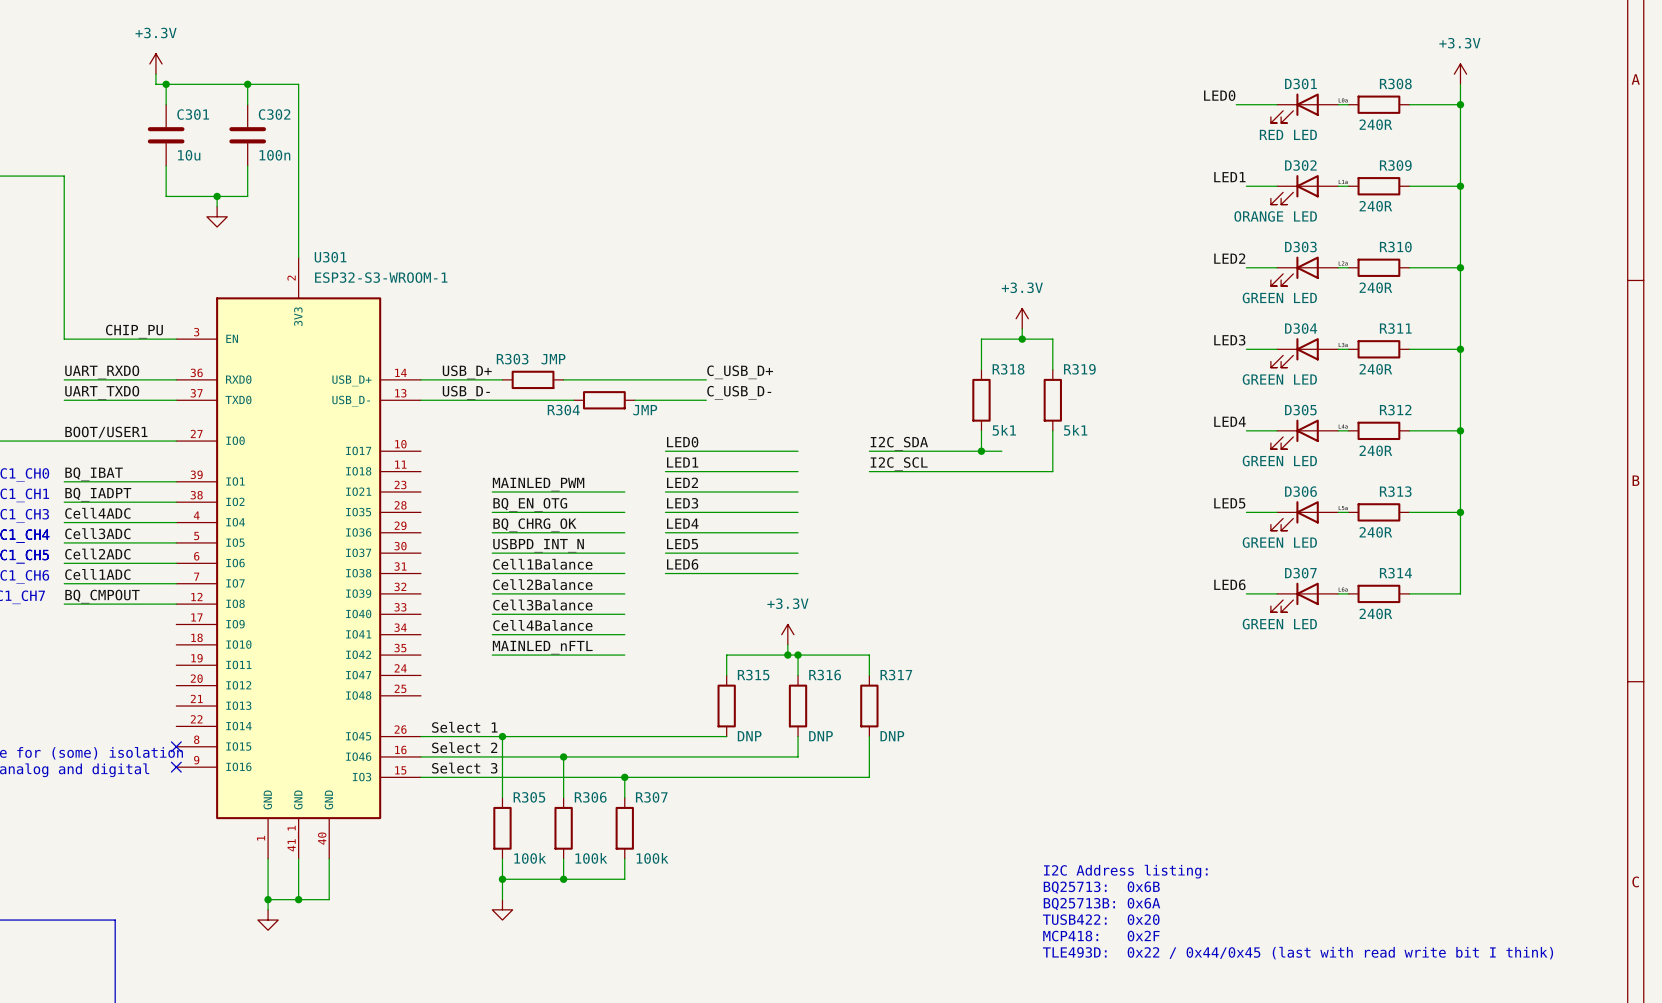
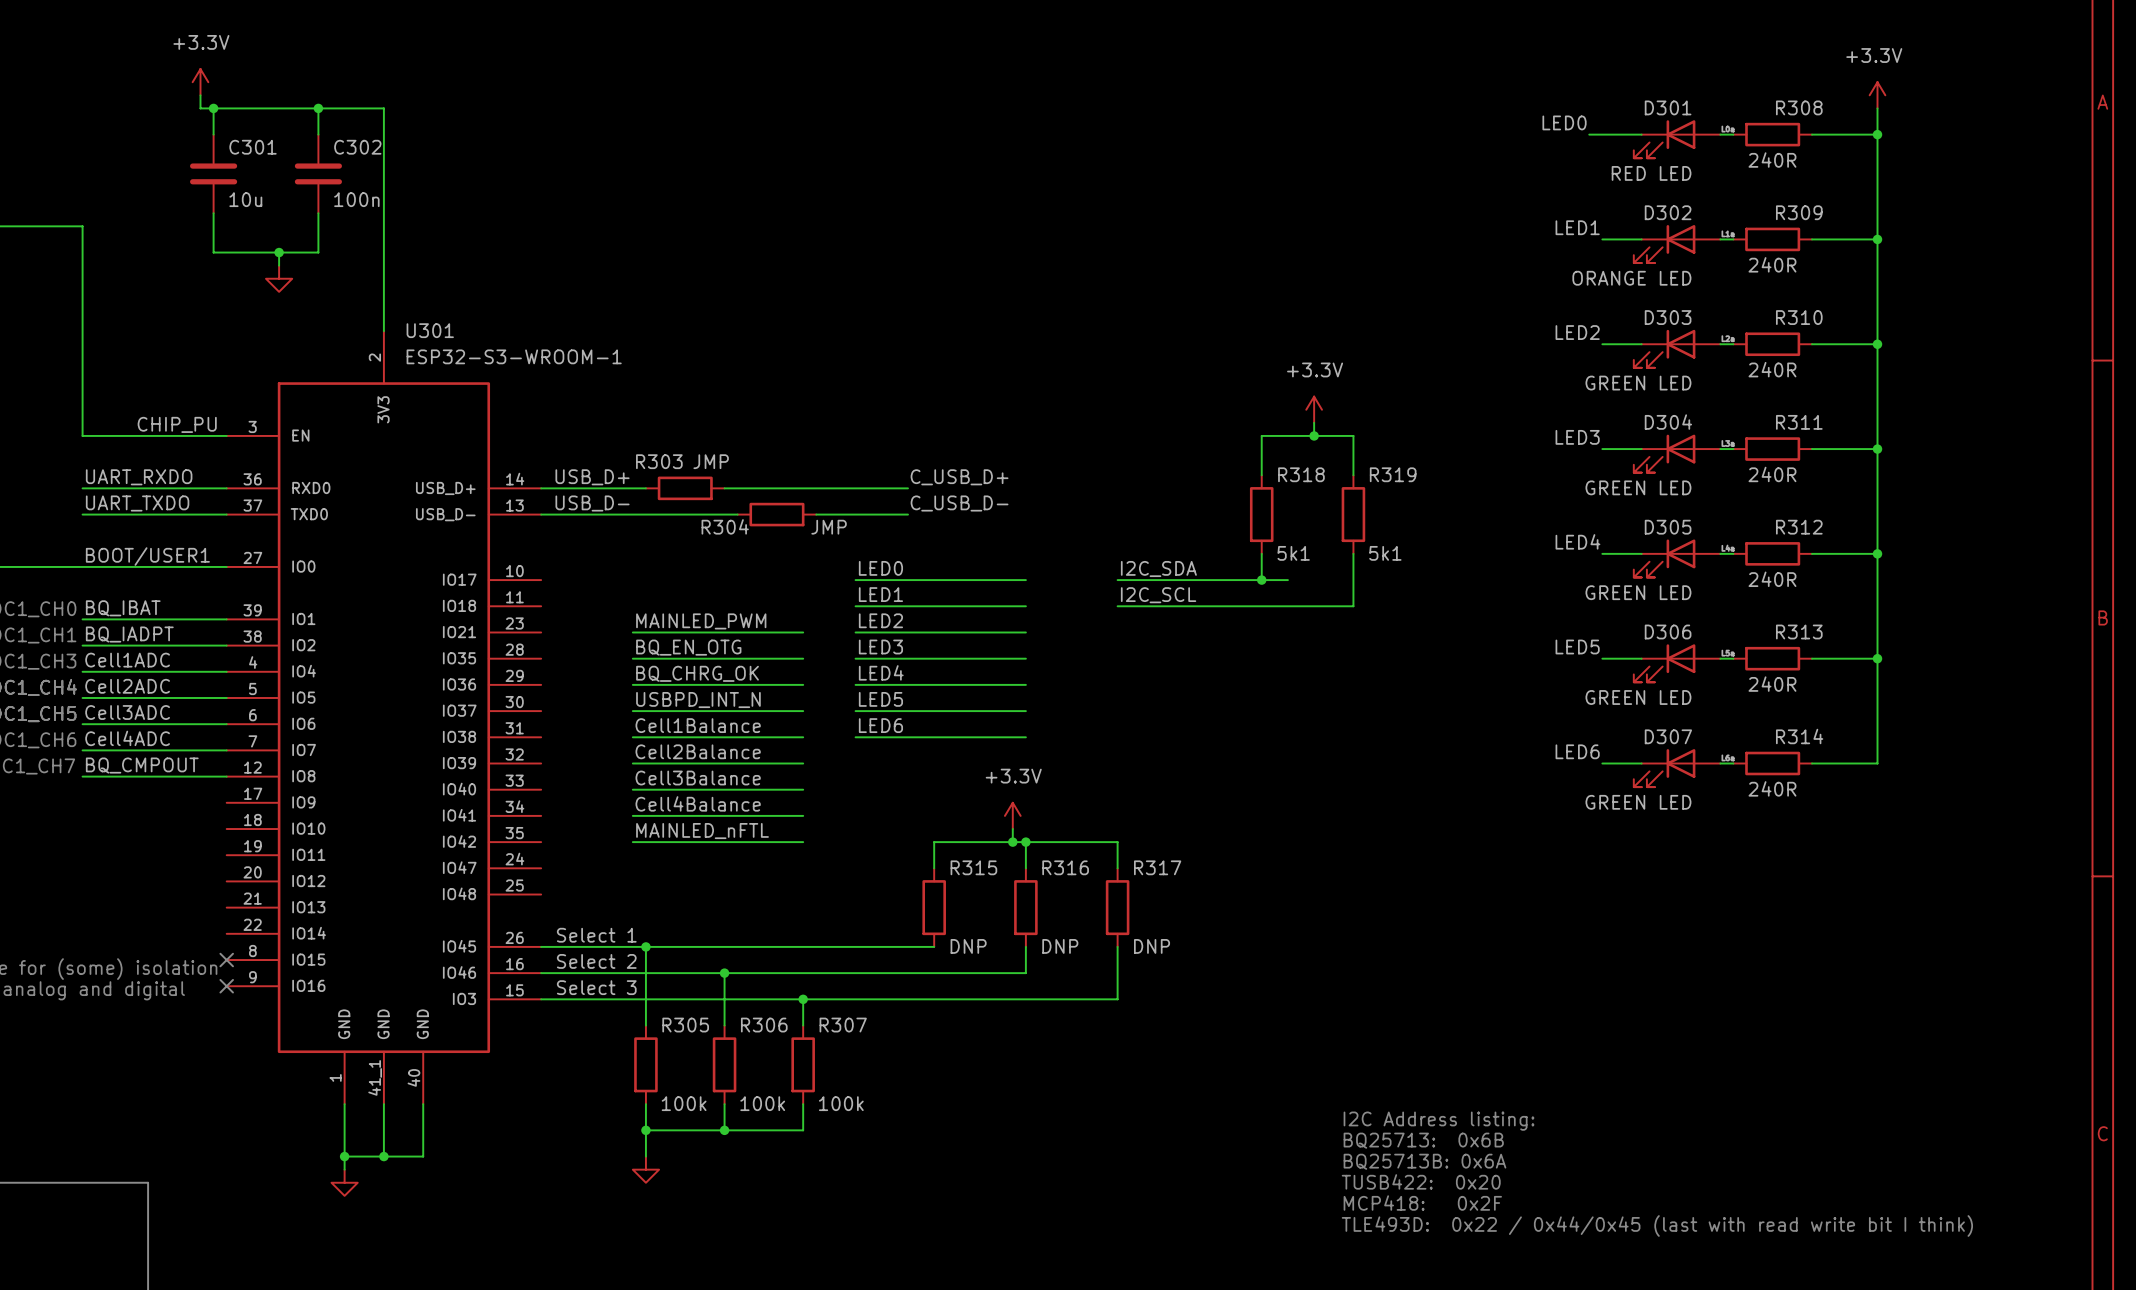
label: Cell4ADC (97, 513) -> Cell1ADC (127, 660)
label: Cell3ADC (97, 533) -> Cell2ADC (127, 686)
label: Cell2ADC (97, 554) -> Cell3ADC (127, 712)
label: Cell1ADC (97, 574) -> Cell4ADC (127, 738)

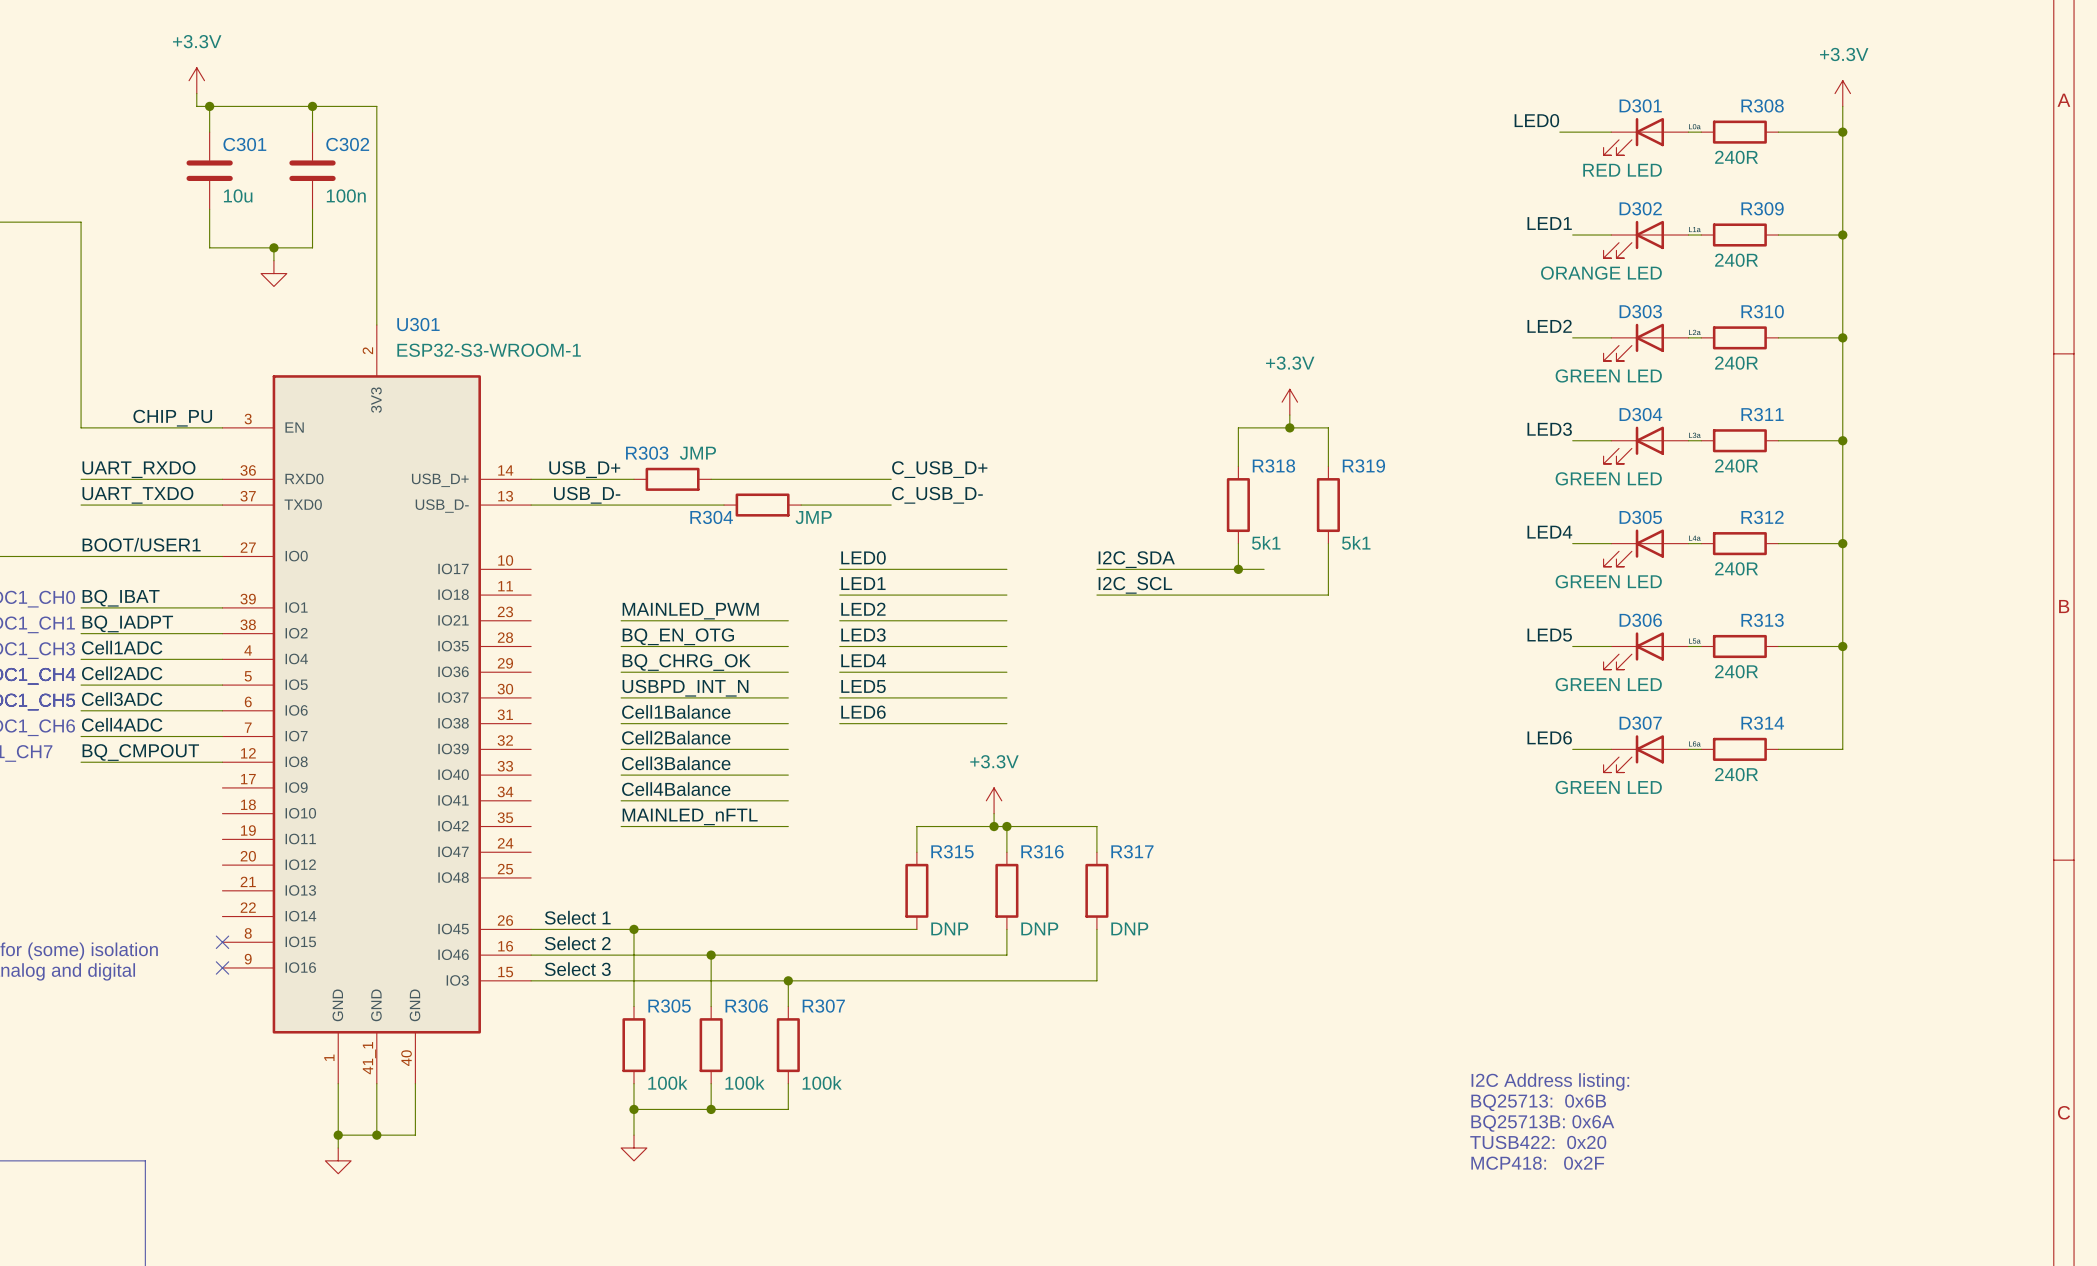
text position: I2C Address listing: (1439, 1121) -> I2C Address listing: (1550, 1081)
text position: BQ25713: 0x6B (1423, 1140) -> BQ25713: 0x6B (1538, 1102)
text position: BQ25713B: 0x6A (1424, 1161) -> BQ25713B: 0x6A (1542, 1123)
text position: TUSB422: 0x20 (1421, 1181) -> TUSB422: 0x20 (1538, 1142)
text position: MCP418: 0x2F (1422, 1203) -> MCP418: 0x2F (1537, 1163)
text: TLE493D: 0x22 / 0x44/0x45 (last with read write bit I think) (1657, 1225) -> none

